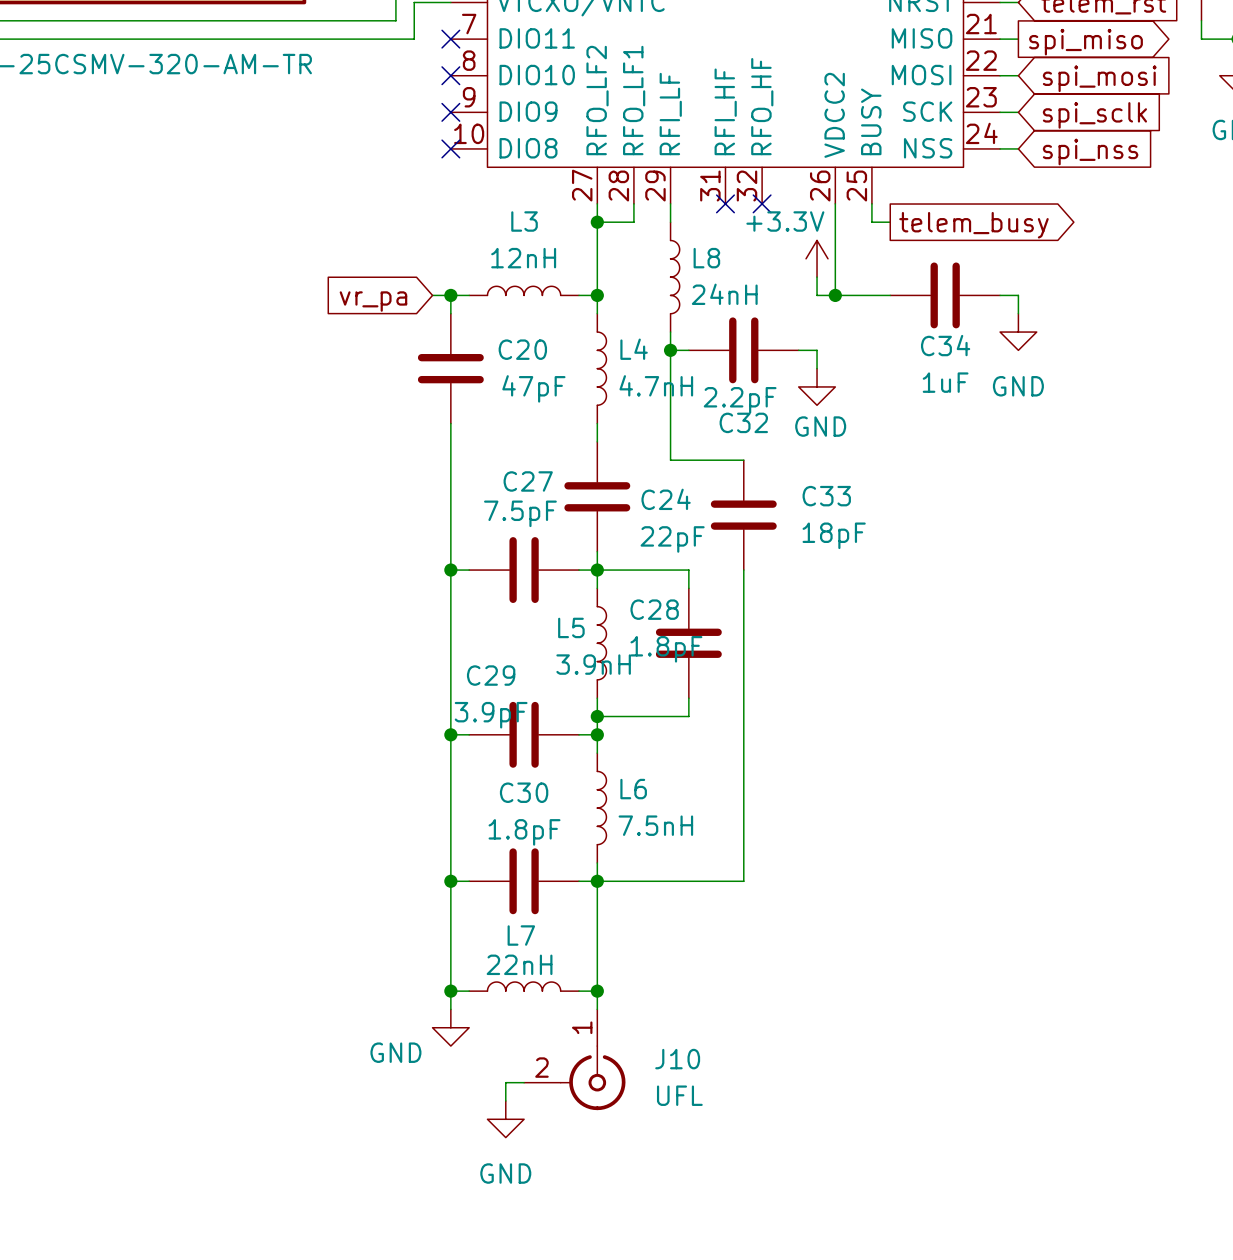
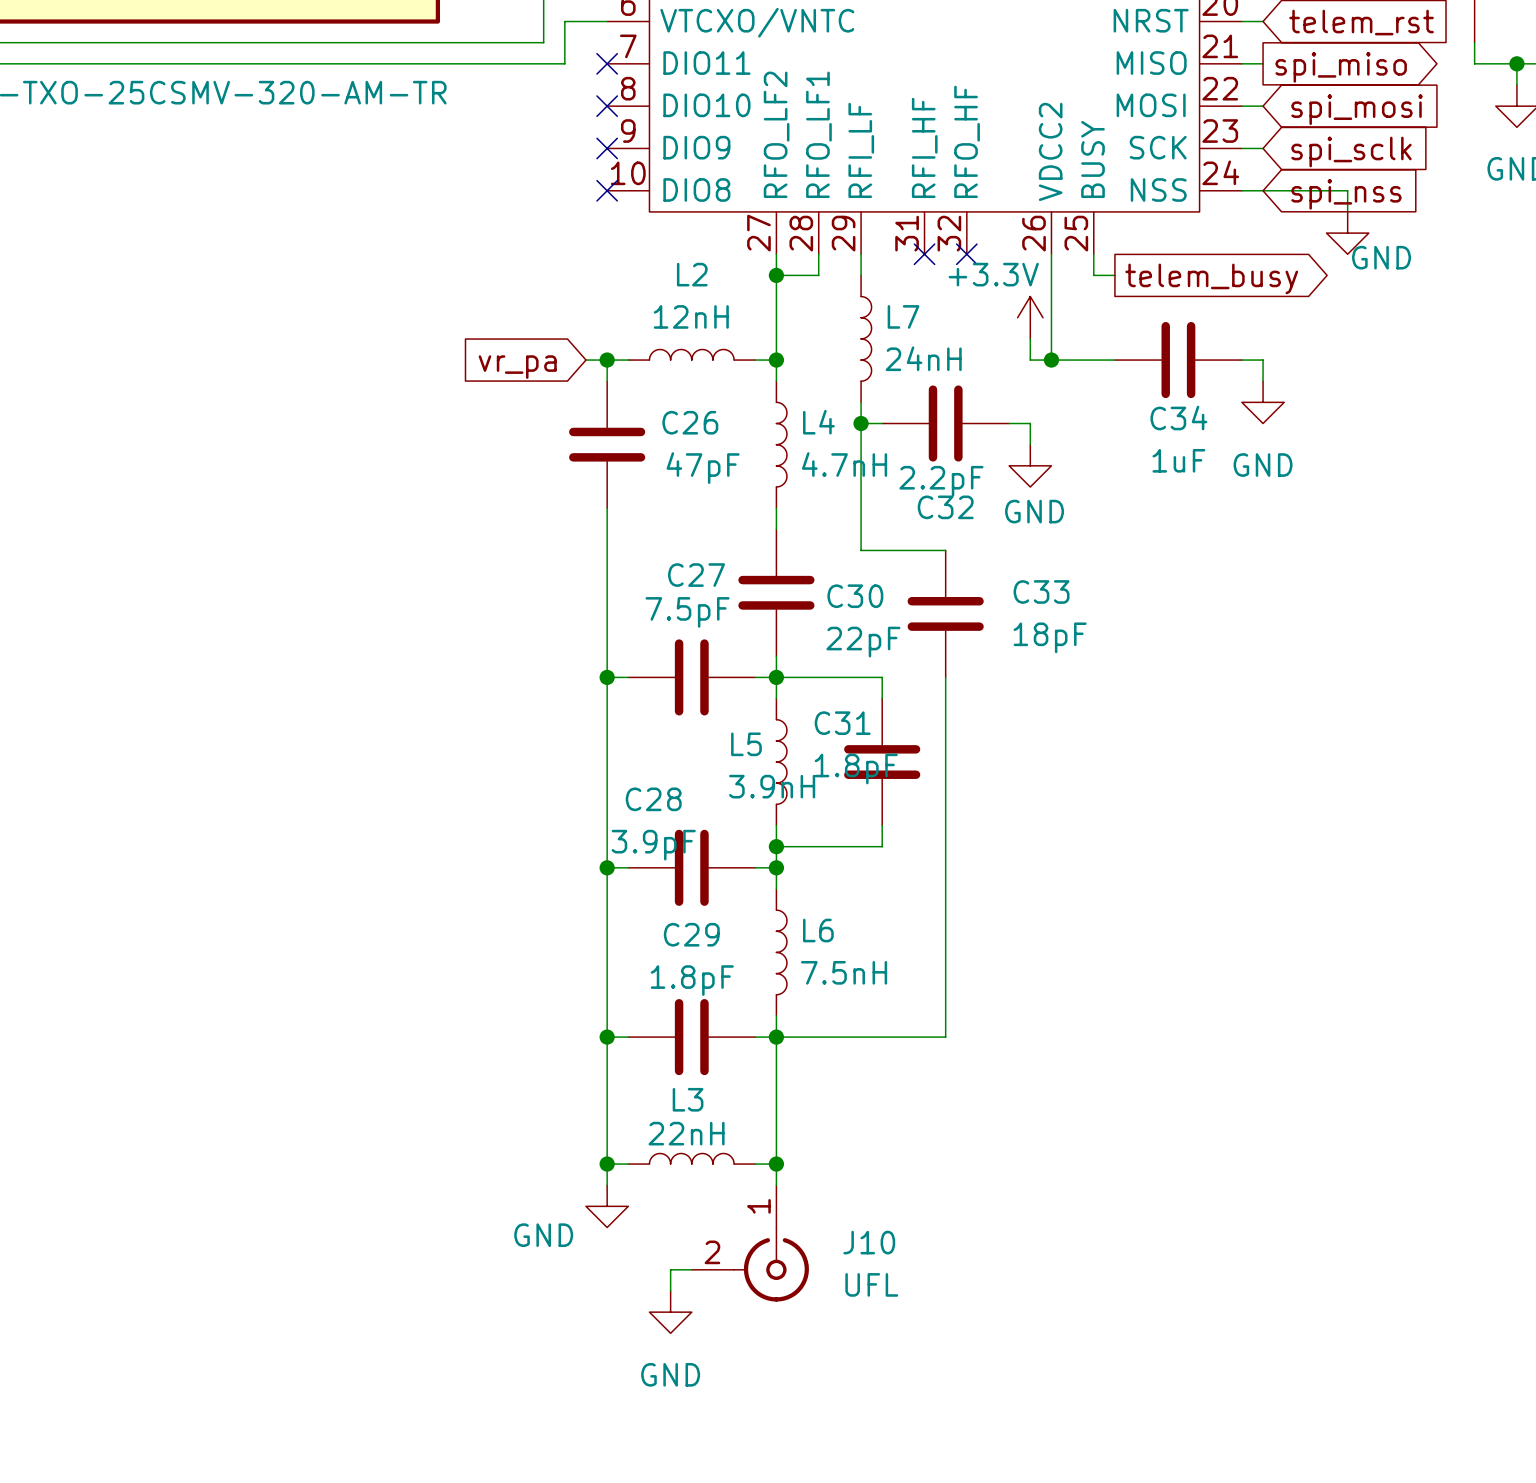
wire: none -> (1263, 190) (1347, 190) (1347, 211)
power symbol: none -> GND (1347, 233)
L3 name: L3 (524, 221) -> L2 (692, 274)
L8 name: L8 (706, 258) -> L7 (903, 316)
C20 name: C20 (522, 349) -> C26 (690, 422)
C24 name: C24 (666, 499) -> C30 (855, 596)
C28 name: C28 (654, 609) -> C31 (842, 723)
C29 name: C29 (491, 675) -> C28 (653, 799)
C30 name: C30 (524, 792) -> C29 (691, 934)
L7 name: L7 (521, 935) -> L3 (688, 1099)

